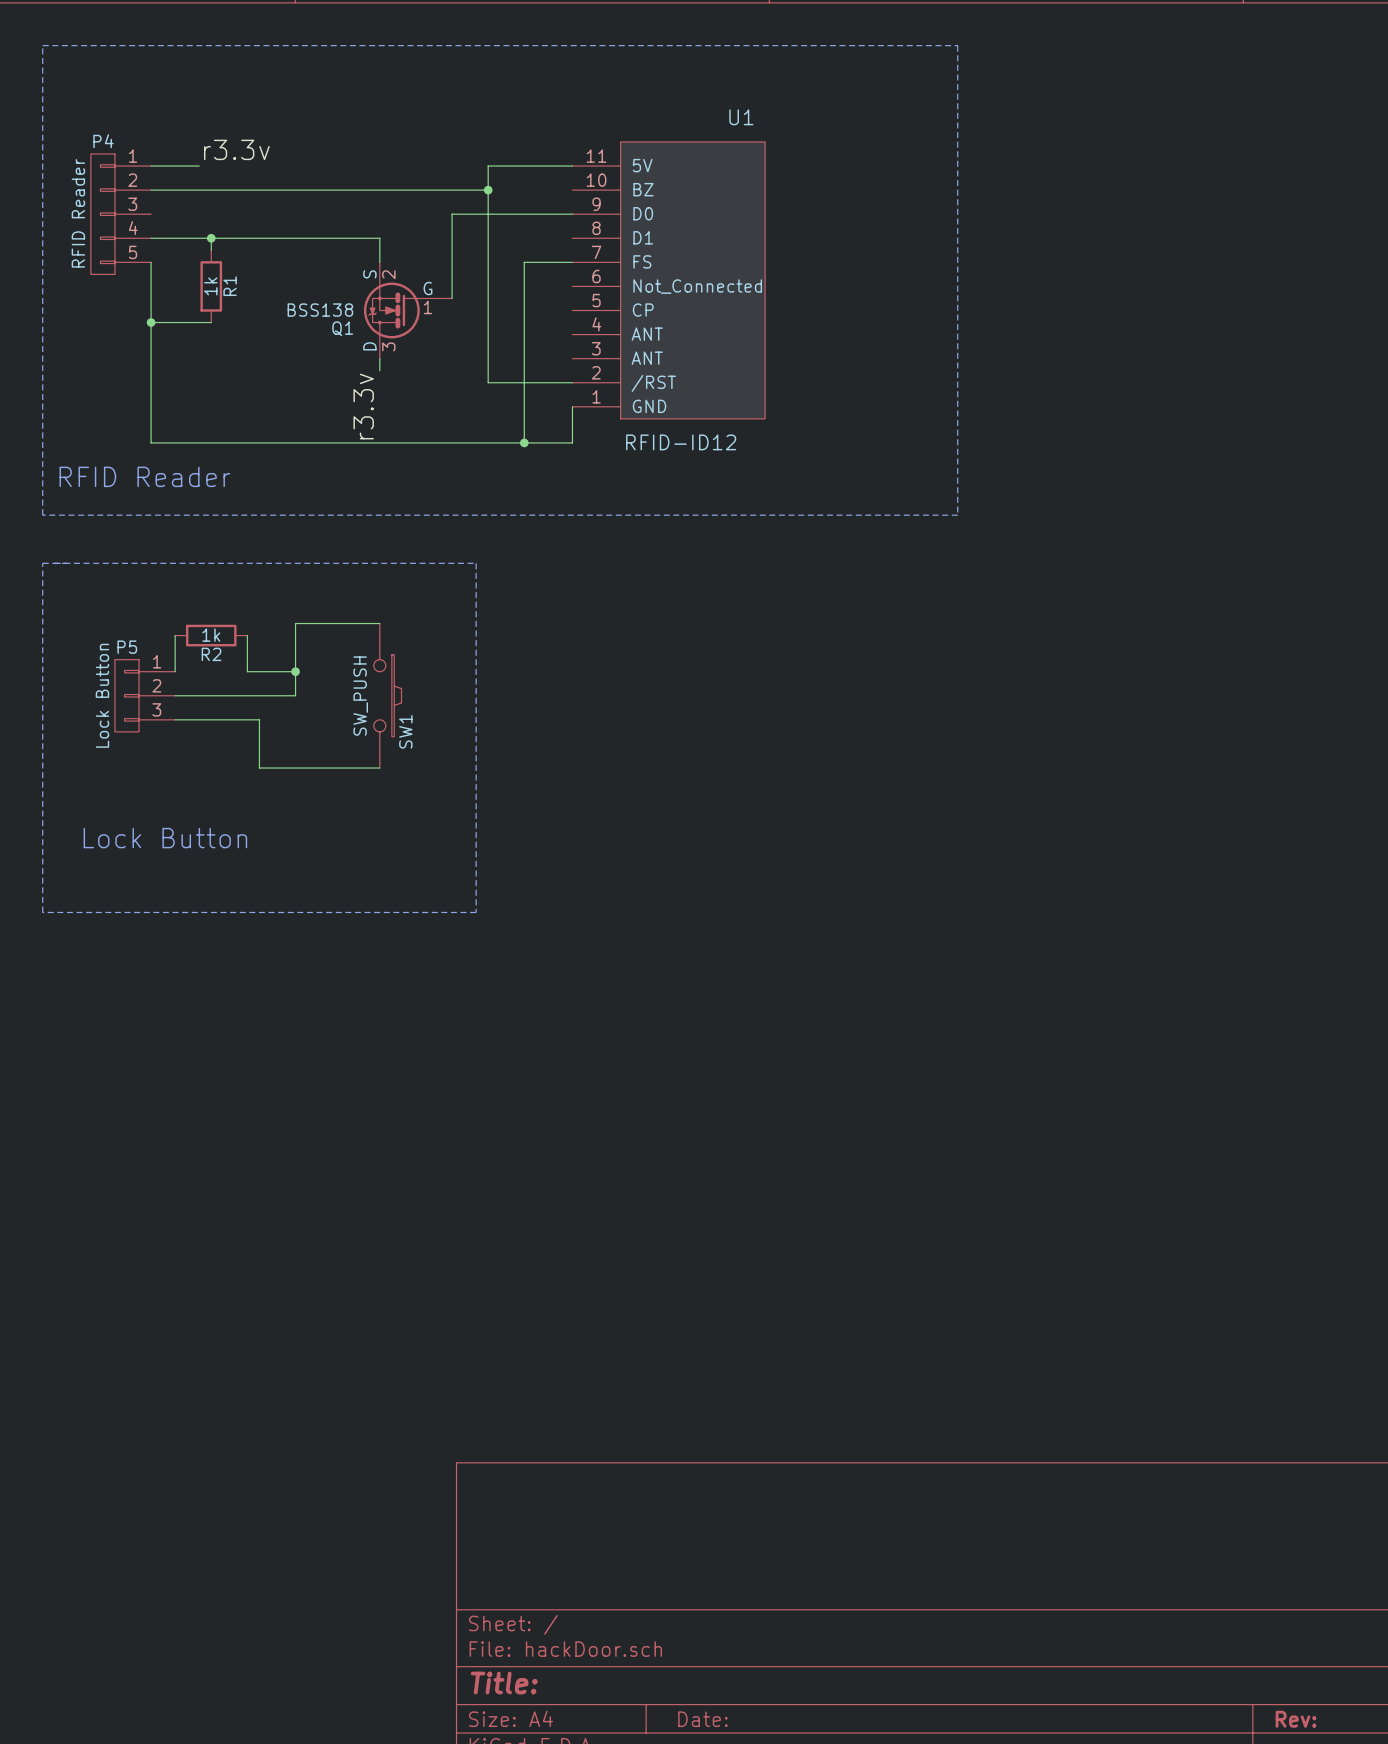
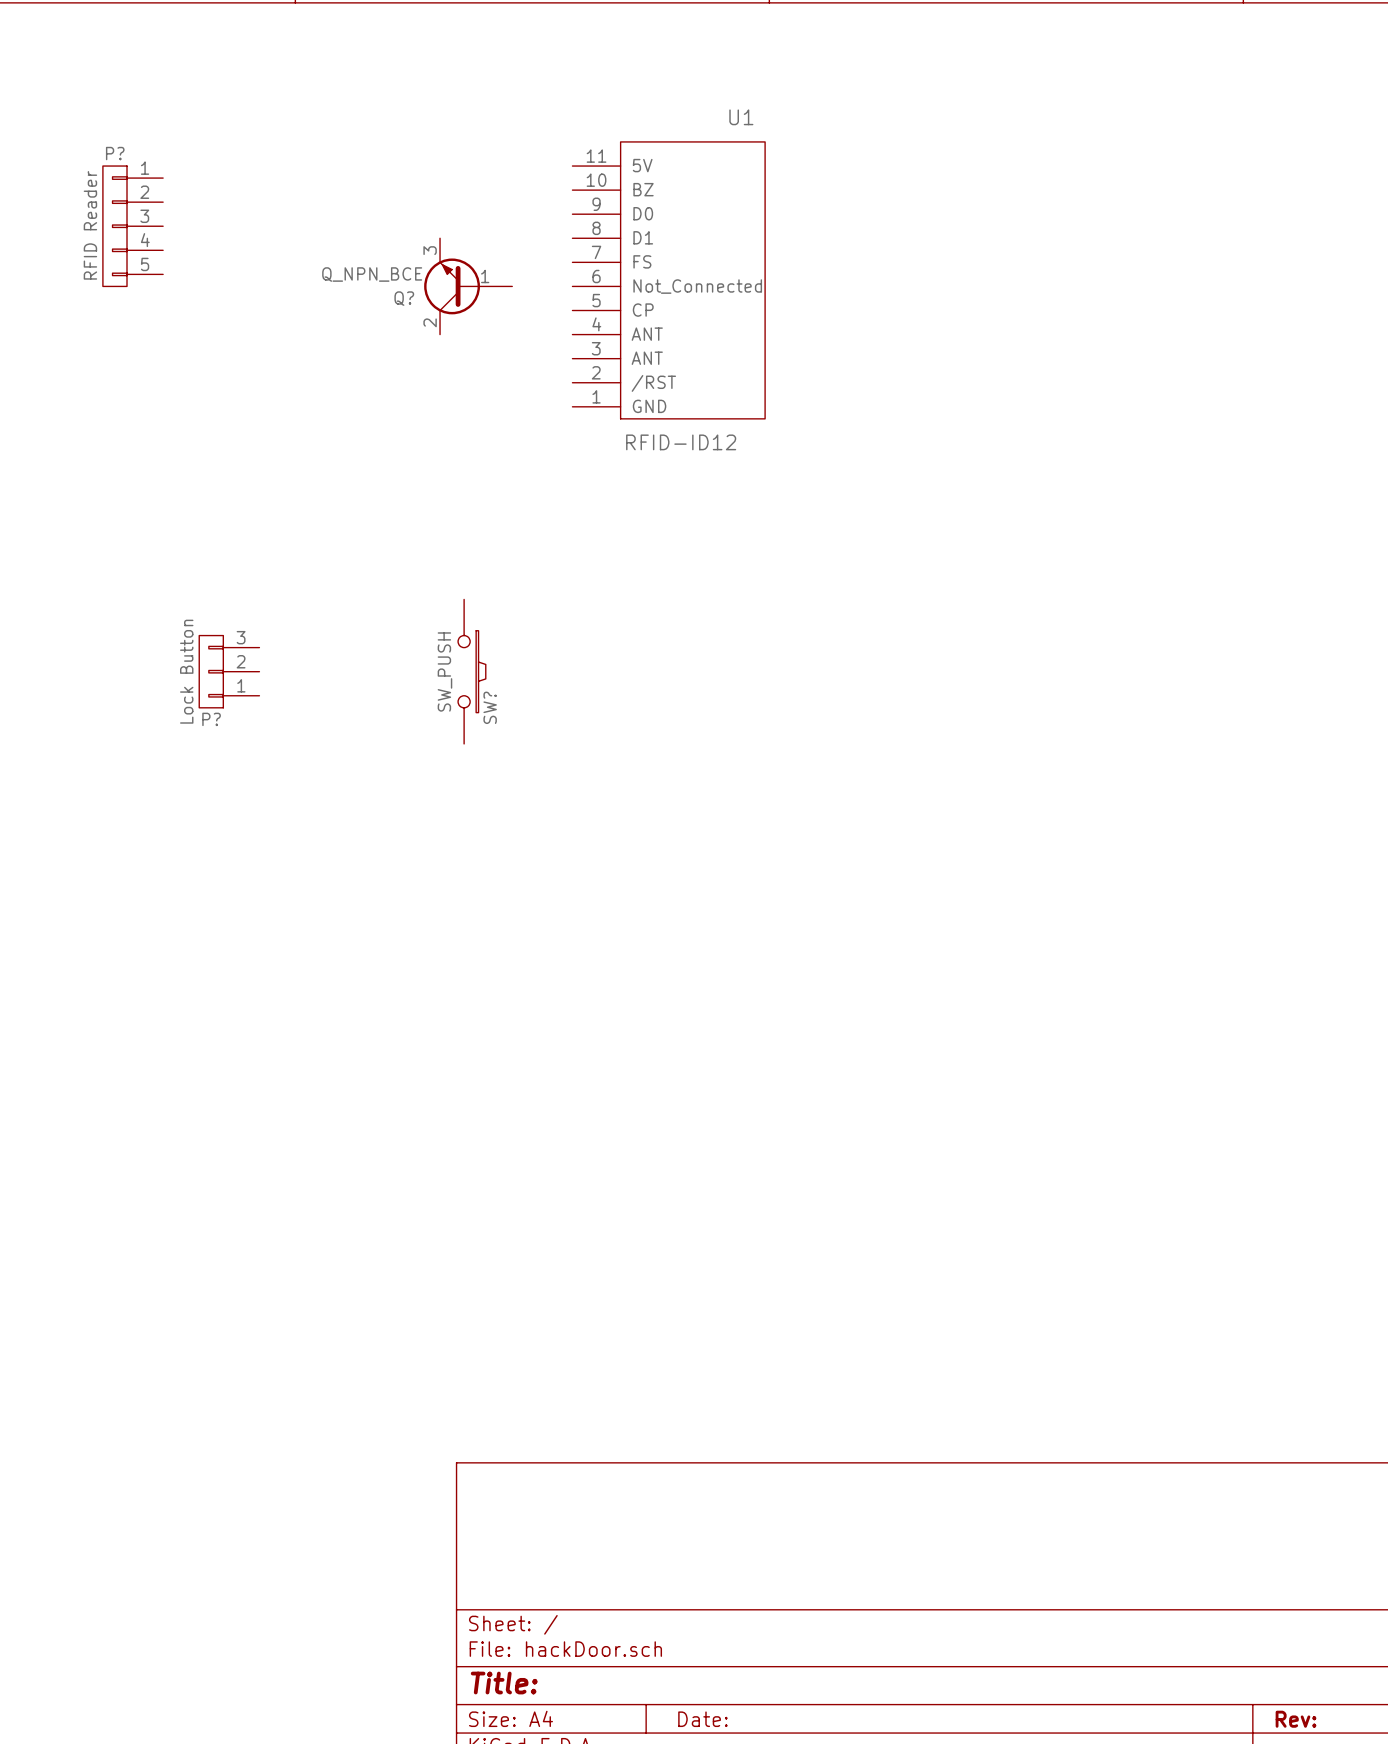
line: (42, 45) (957, 45) (957, 515) (42, 515) (42, 45) -> none
label: r3.3v (236, 149) -> none
wire: (151, 166) (199, 166) -> none
wire: (572, 166) (488, 166) (488, 382) (572, 382) -> none
wire: (151, 190) (488, 190) -> none
junction: (488, 190) -> none
P4: RFID Reader (120, 214) -> none
wire: (572, 214) (452, 214) (452, 298) -> none
P?: none -> RFID Reader (133, 226)
wire: (151, 238) (379, 238) (379, 262) -> none
wire: (211, 238) (211, 250) -> none
junction: (211, 238) -> none
wire: (151, 262) (151, 442) (572, 442) (572, 406) -> none
wire: (572, 262) (524, 262) (524, 442) -> none
R1: 1k (211, 286) -> none
Q?: none -> Q_NPN_BCE (468, 286)
Q1: BSS138 (408, 310) -> none
wire: (151, 322) (211, 322) -> none
junction: (151, 322) -> none
wire: (379, 358) (379, 370) -> none
label: r3.3v (363, 406) -> none
junction: (524, 442) -> none
text: RFID Reader (144, 476) -> none
line: (42, 563) (42, 912) (476, 912) (476, 563) (42, 563) -> none
wire: (379, 623) (295, 623) (295, 695) (175, 695) -> none
wire: (175, 635) (175, 671) -> none
R2: 1k (211, 635) -> none
wire: (247, 635) (247, 671) (295, 671) -> none
P?: none -> Lock Button (229, 671)
junction: (295, 671) -> none
SW?: none -> SW_PUSH (471, 671)
P5: Lock Button (145, 695) -> none
SW1: SW_PUSH (387, 695) -> none
wire: (175, 719) (259, 719) (259, 768) (379, 768) -> none
text: Lock Button (165, 838) -> none

